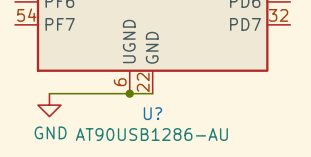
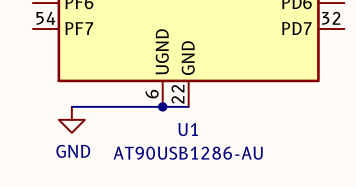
U? name: U? (152, 113) -> U1 (188, 129)

